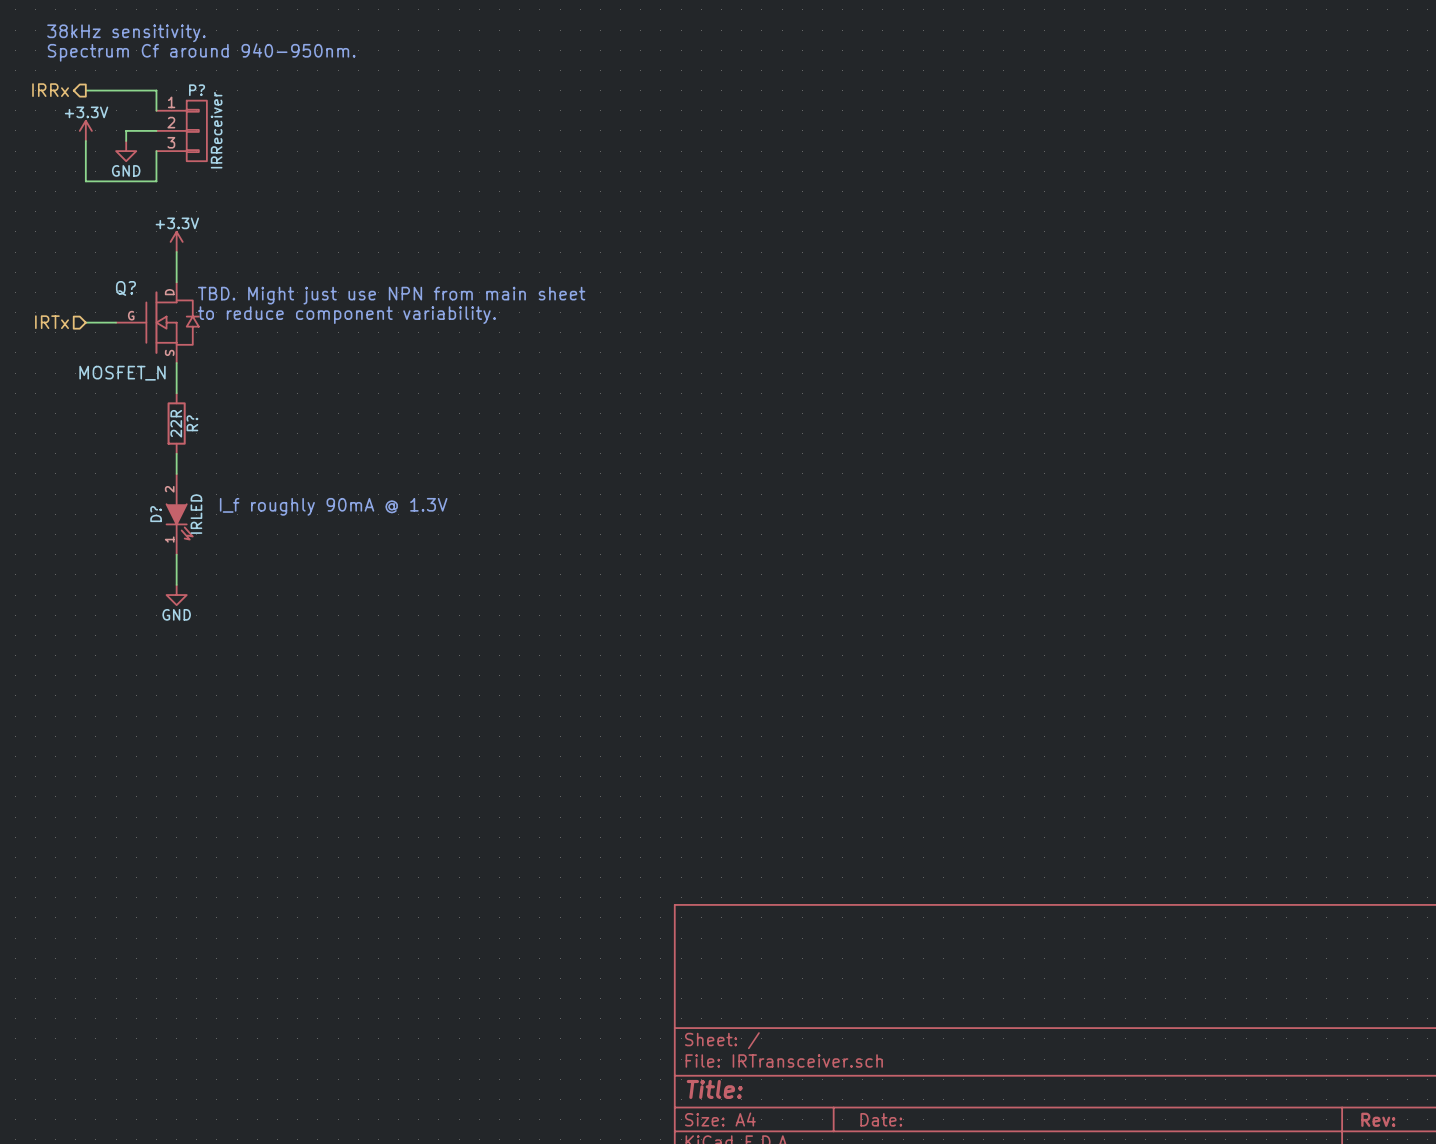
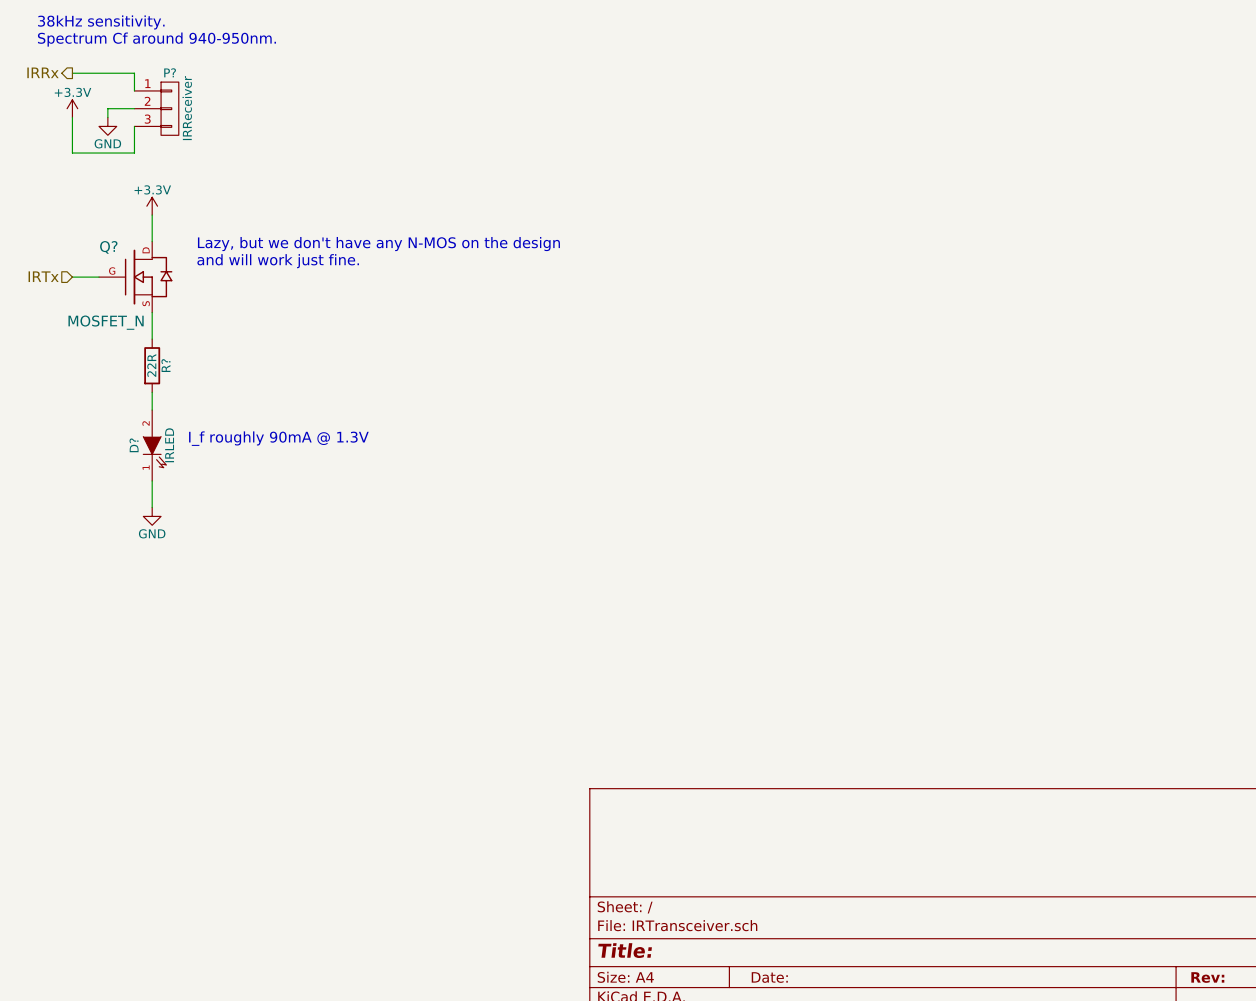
text: none -> Lazy, but we don't have any N-MOS on the design (378, 244)
text: TBD. Might just use NPN from main sheet (391, 295) -> none
text: none -> and will work just fine. (278, 261)
text: to reduce component variability. (346, 315) -> none

